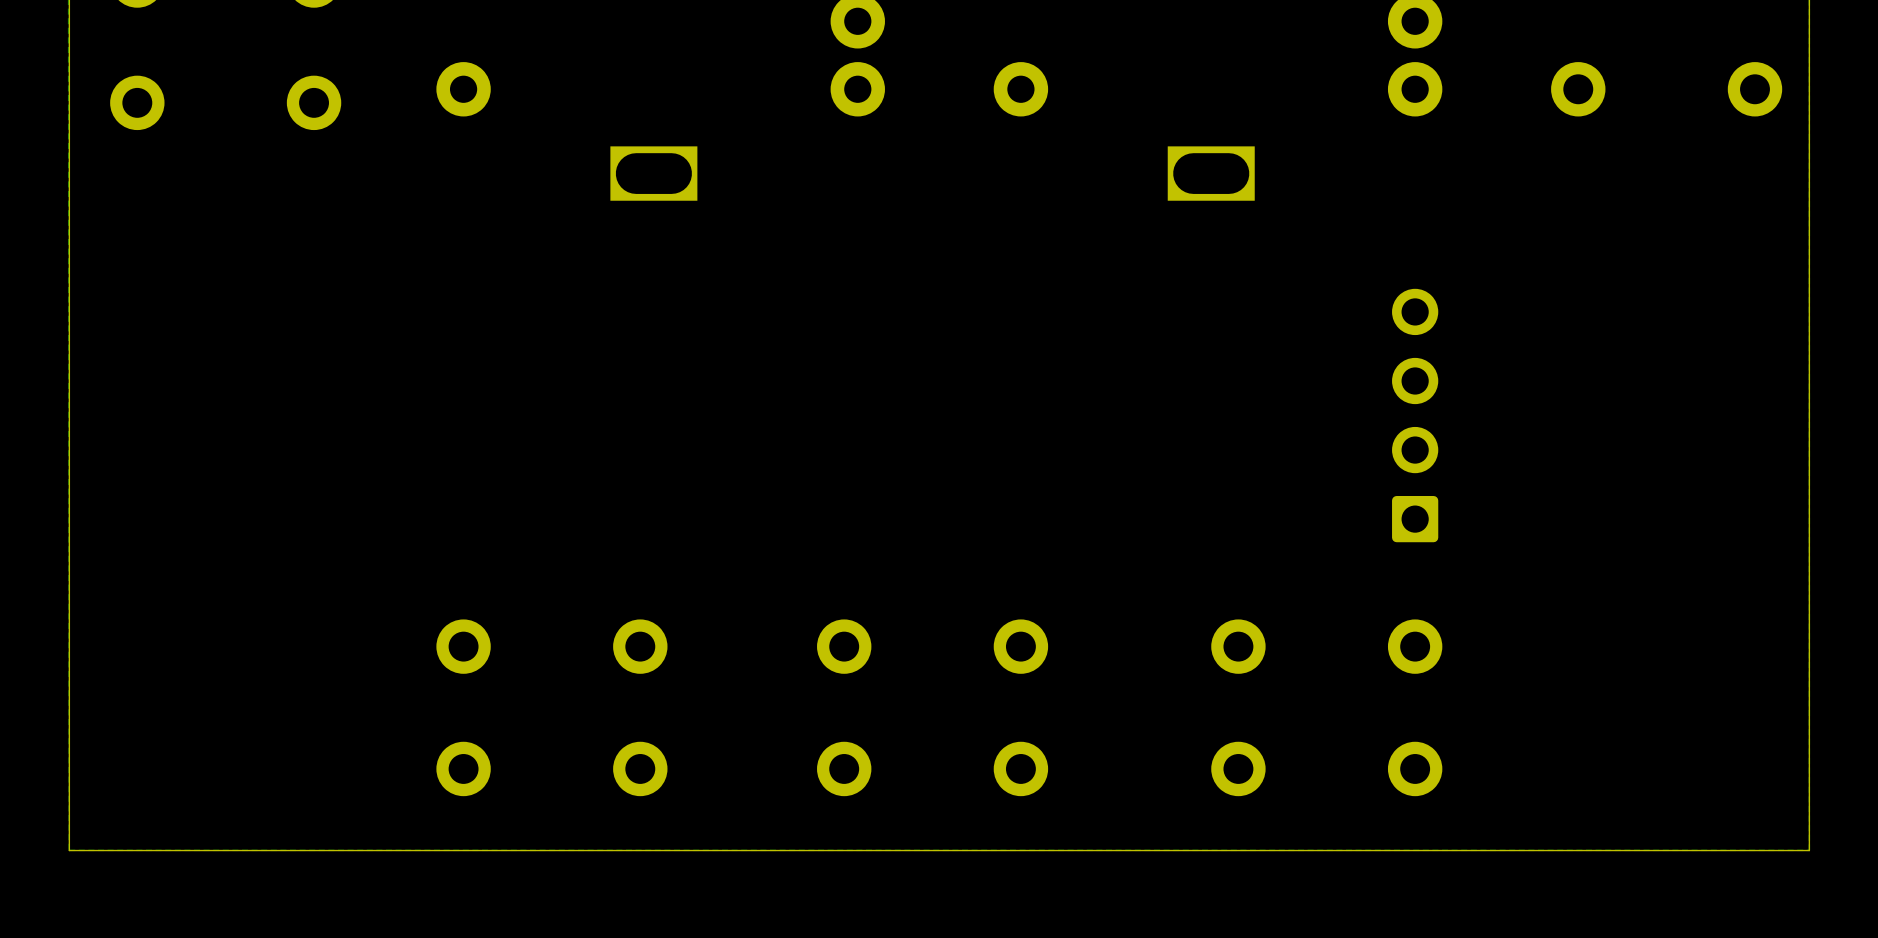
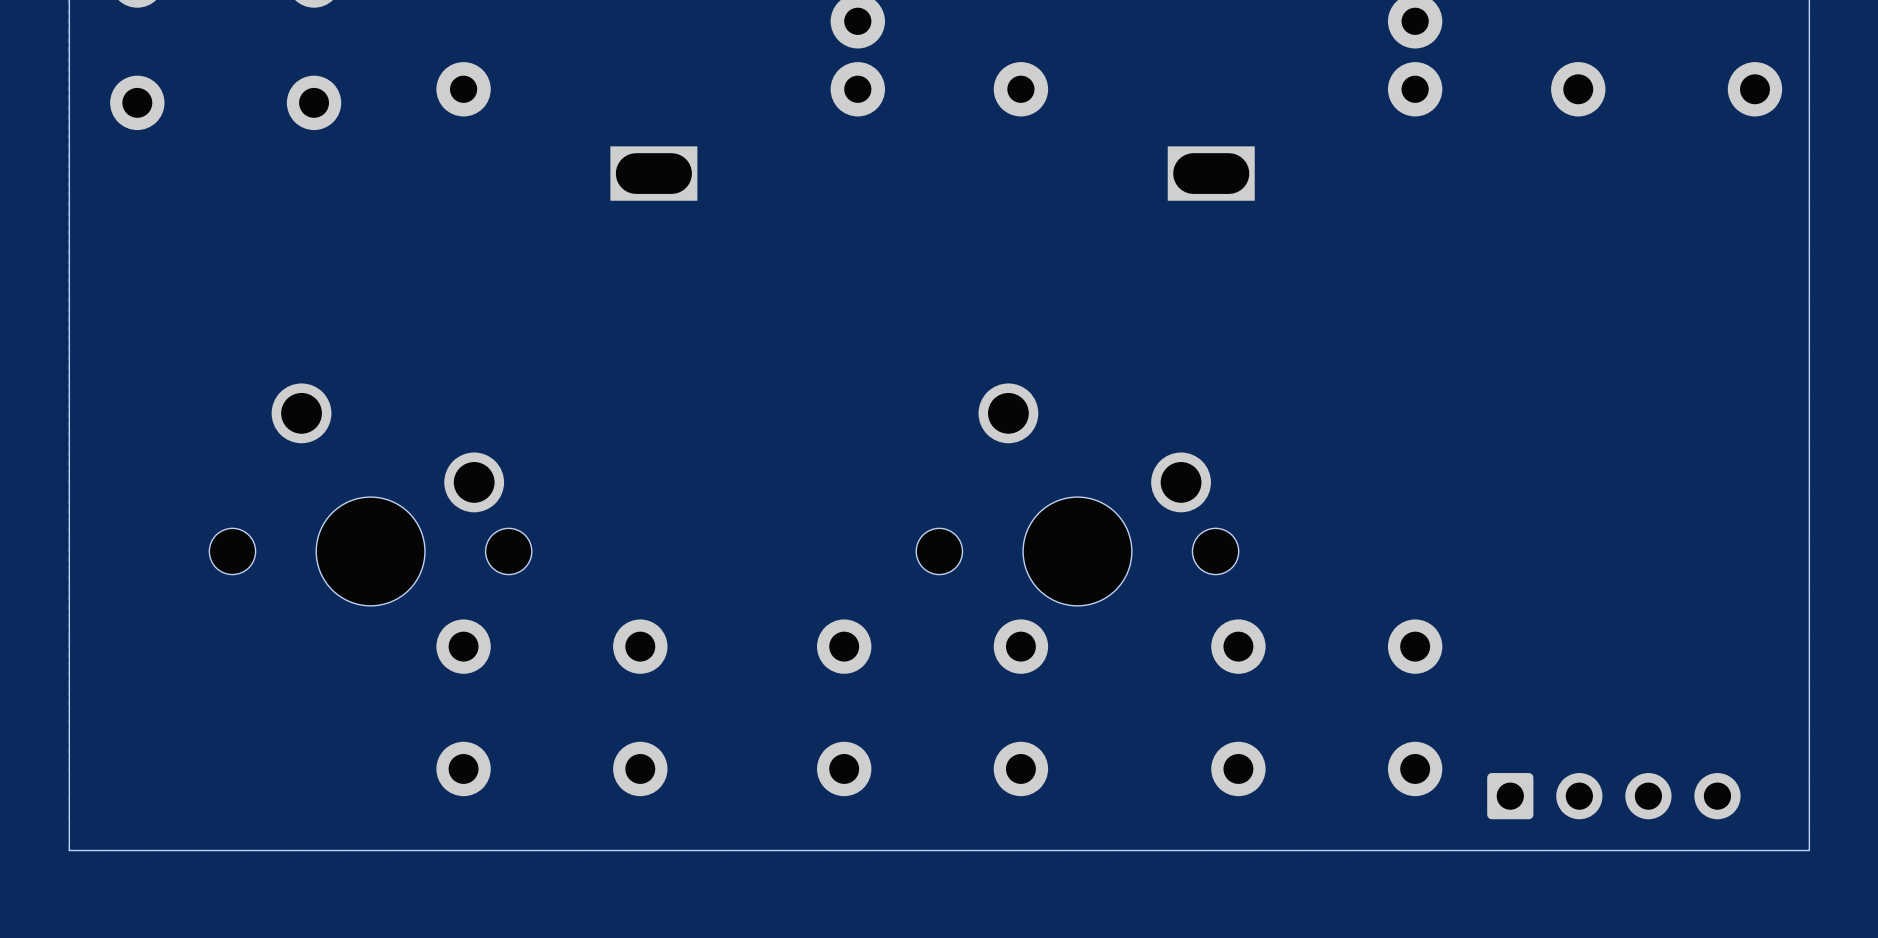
part rotation: 0° (1415, 415) -> 90° clockwise (1613, 796)
part position: (1415, 415) -> (1613, 796)
part: none -> (370, 494)
part: none -> (1077, 494)

